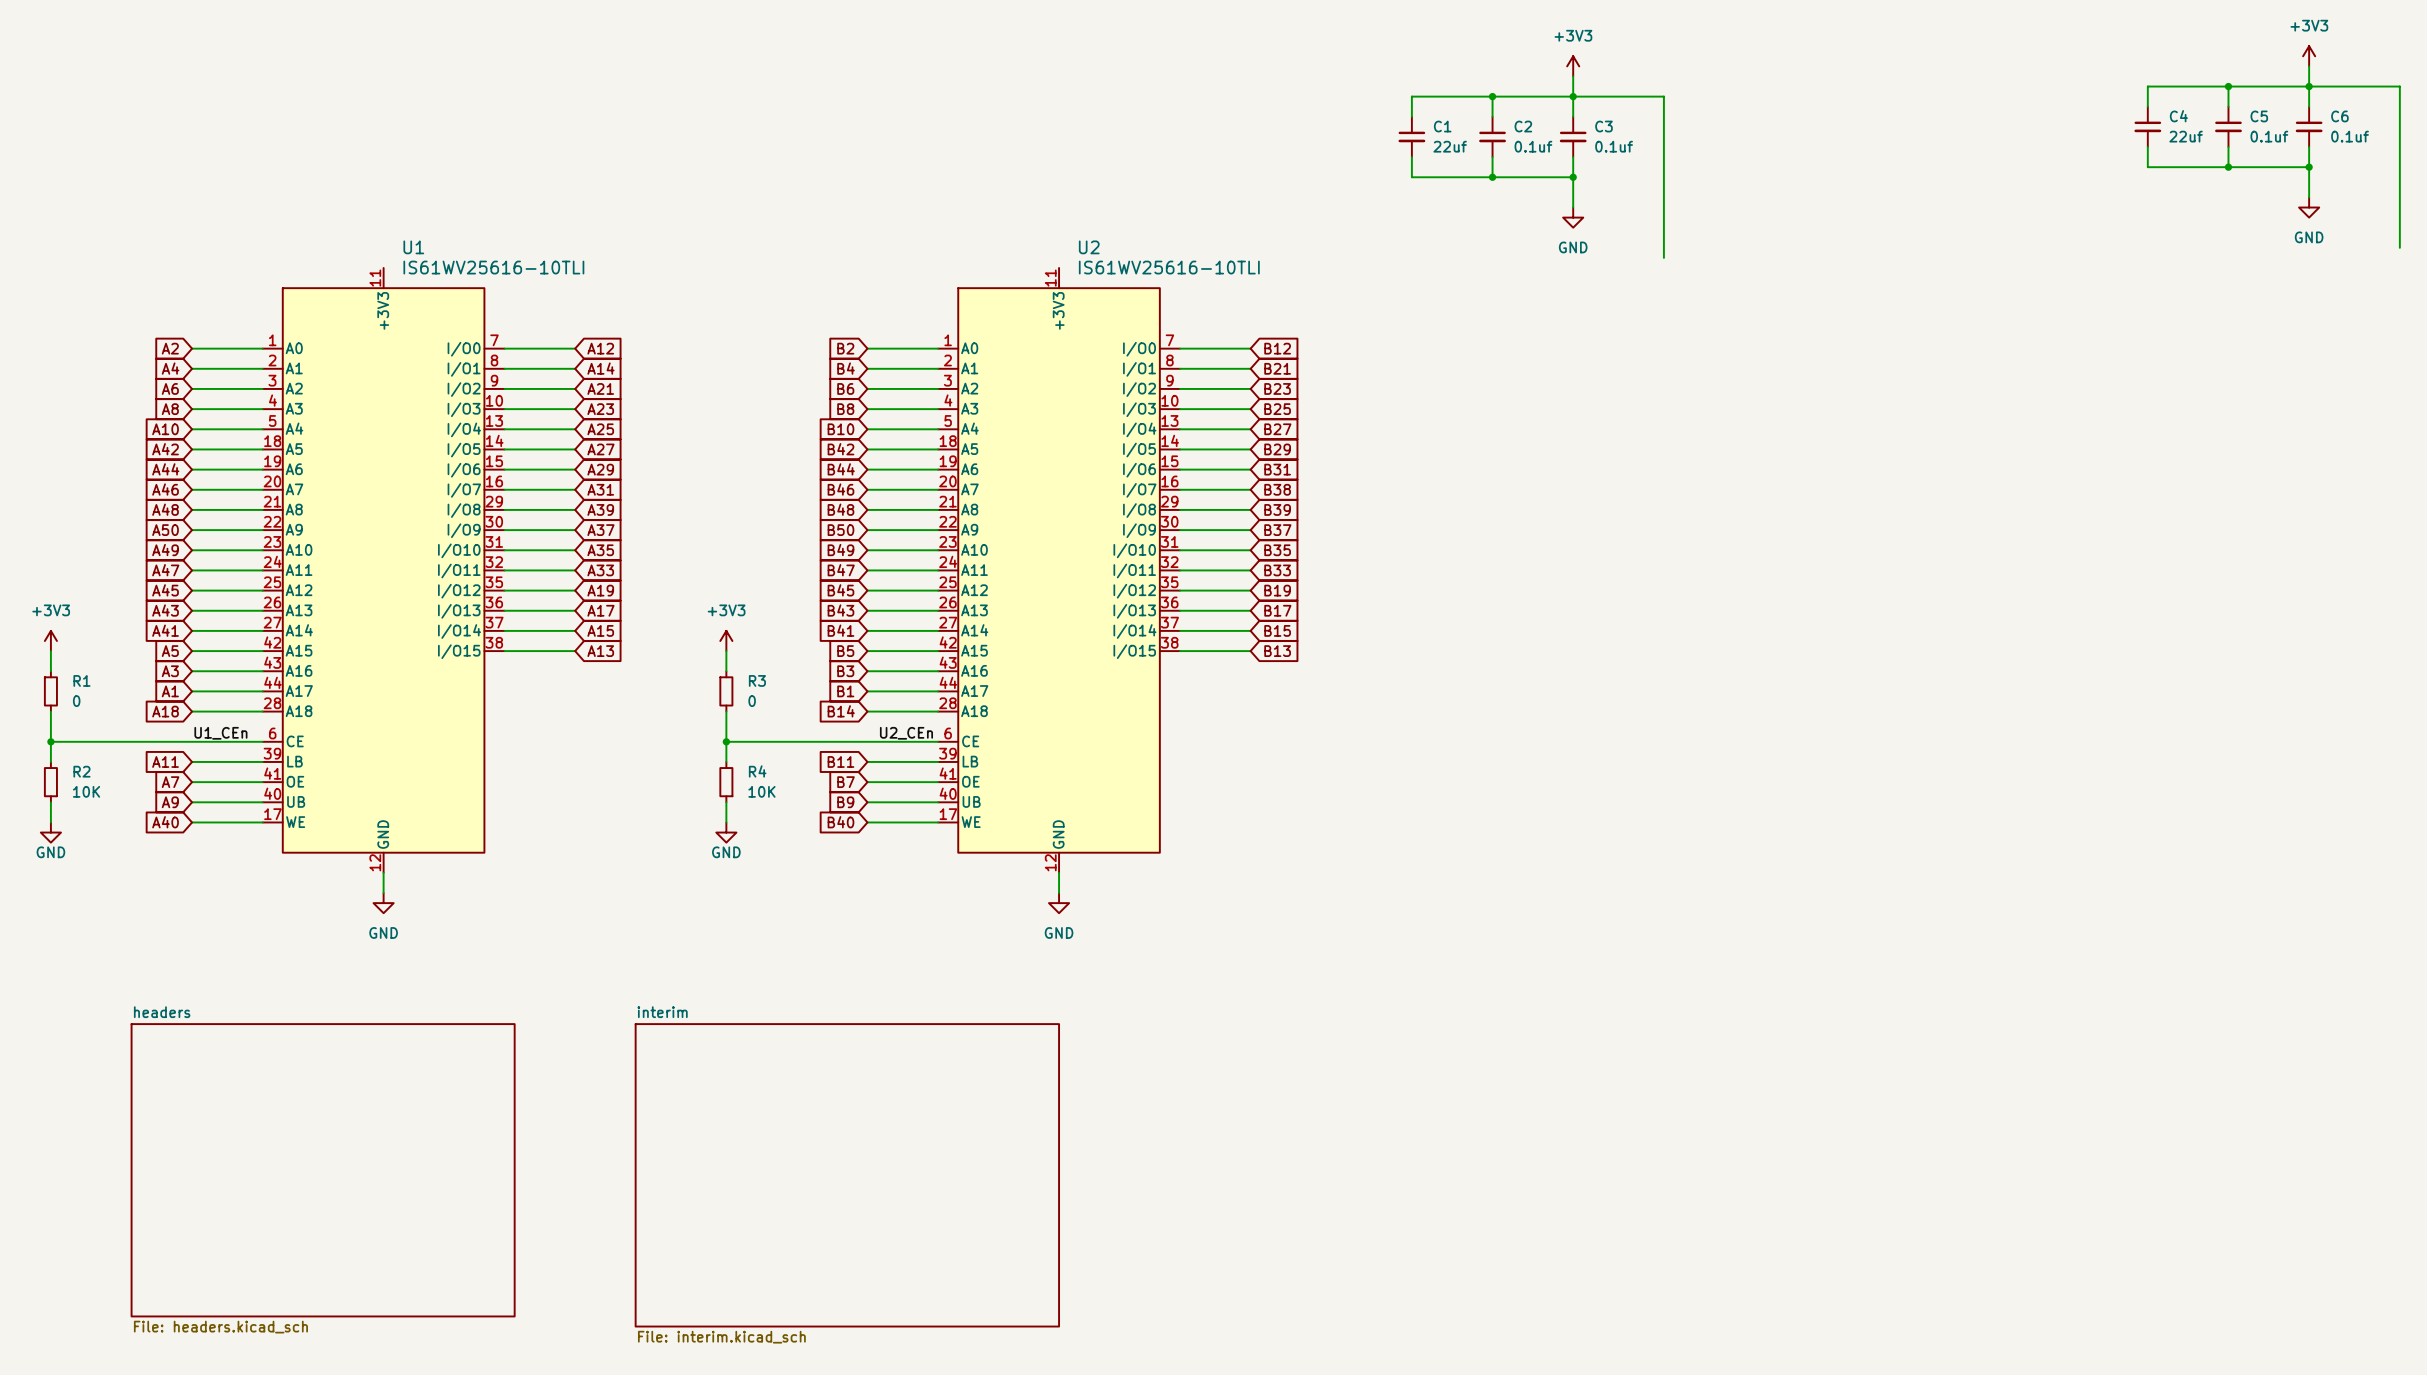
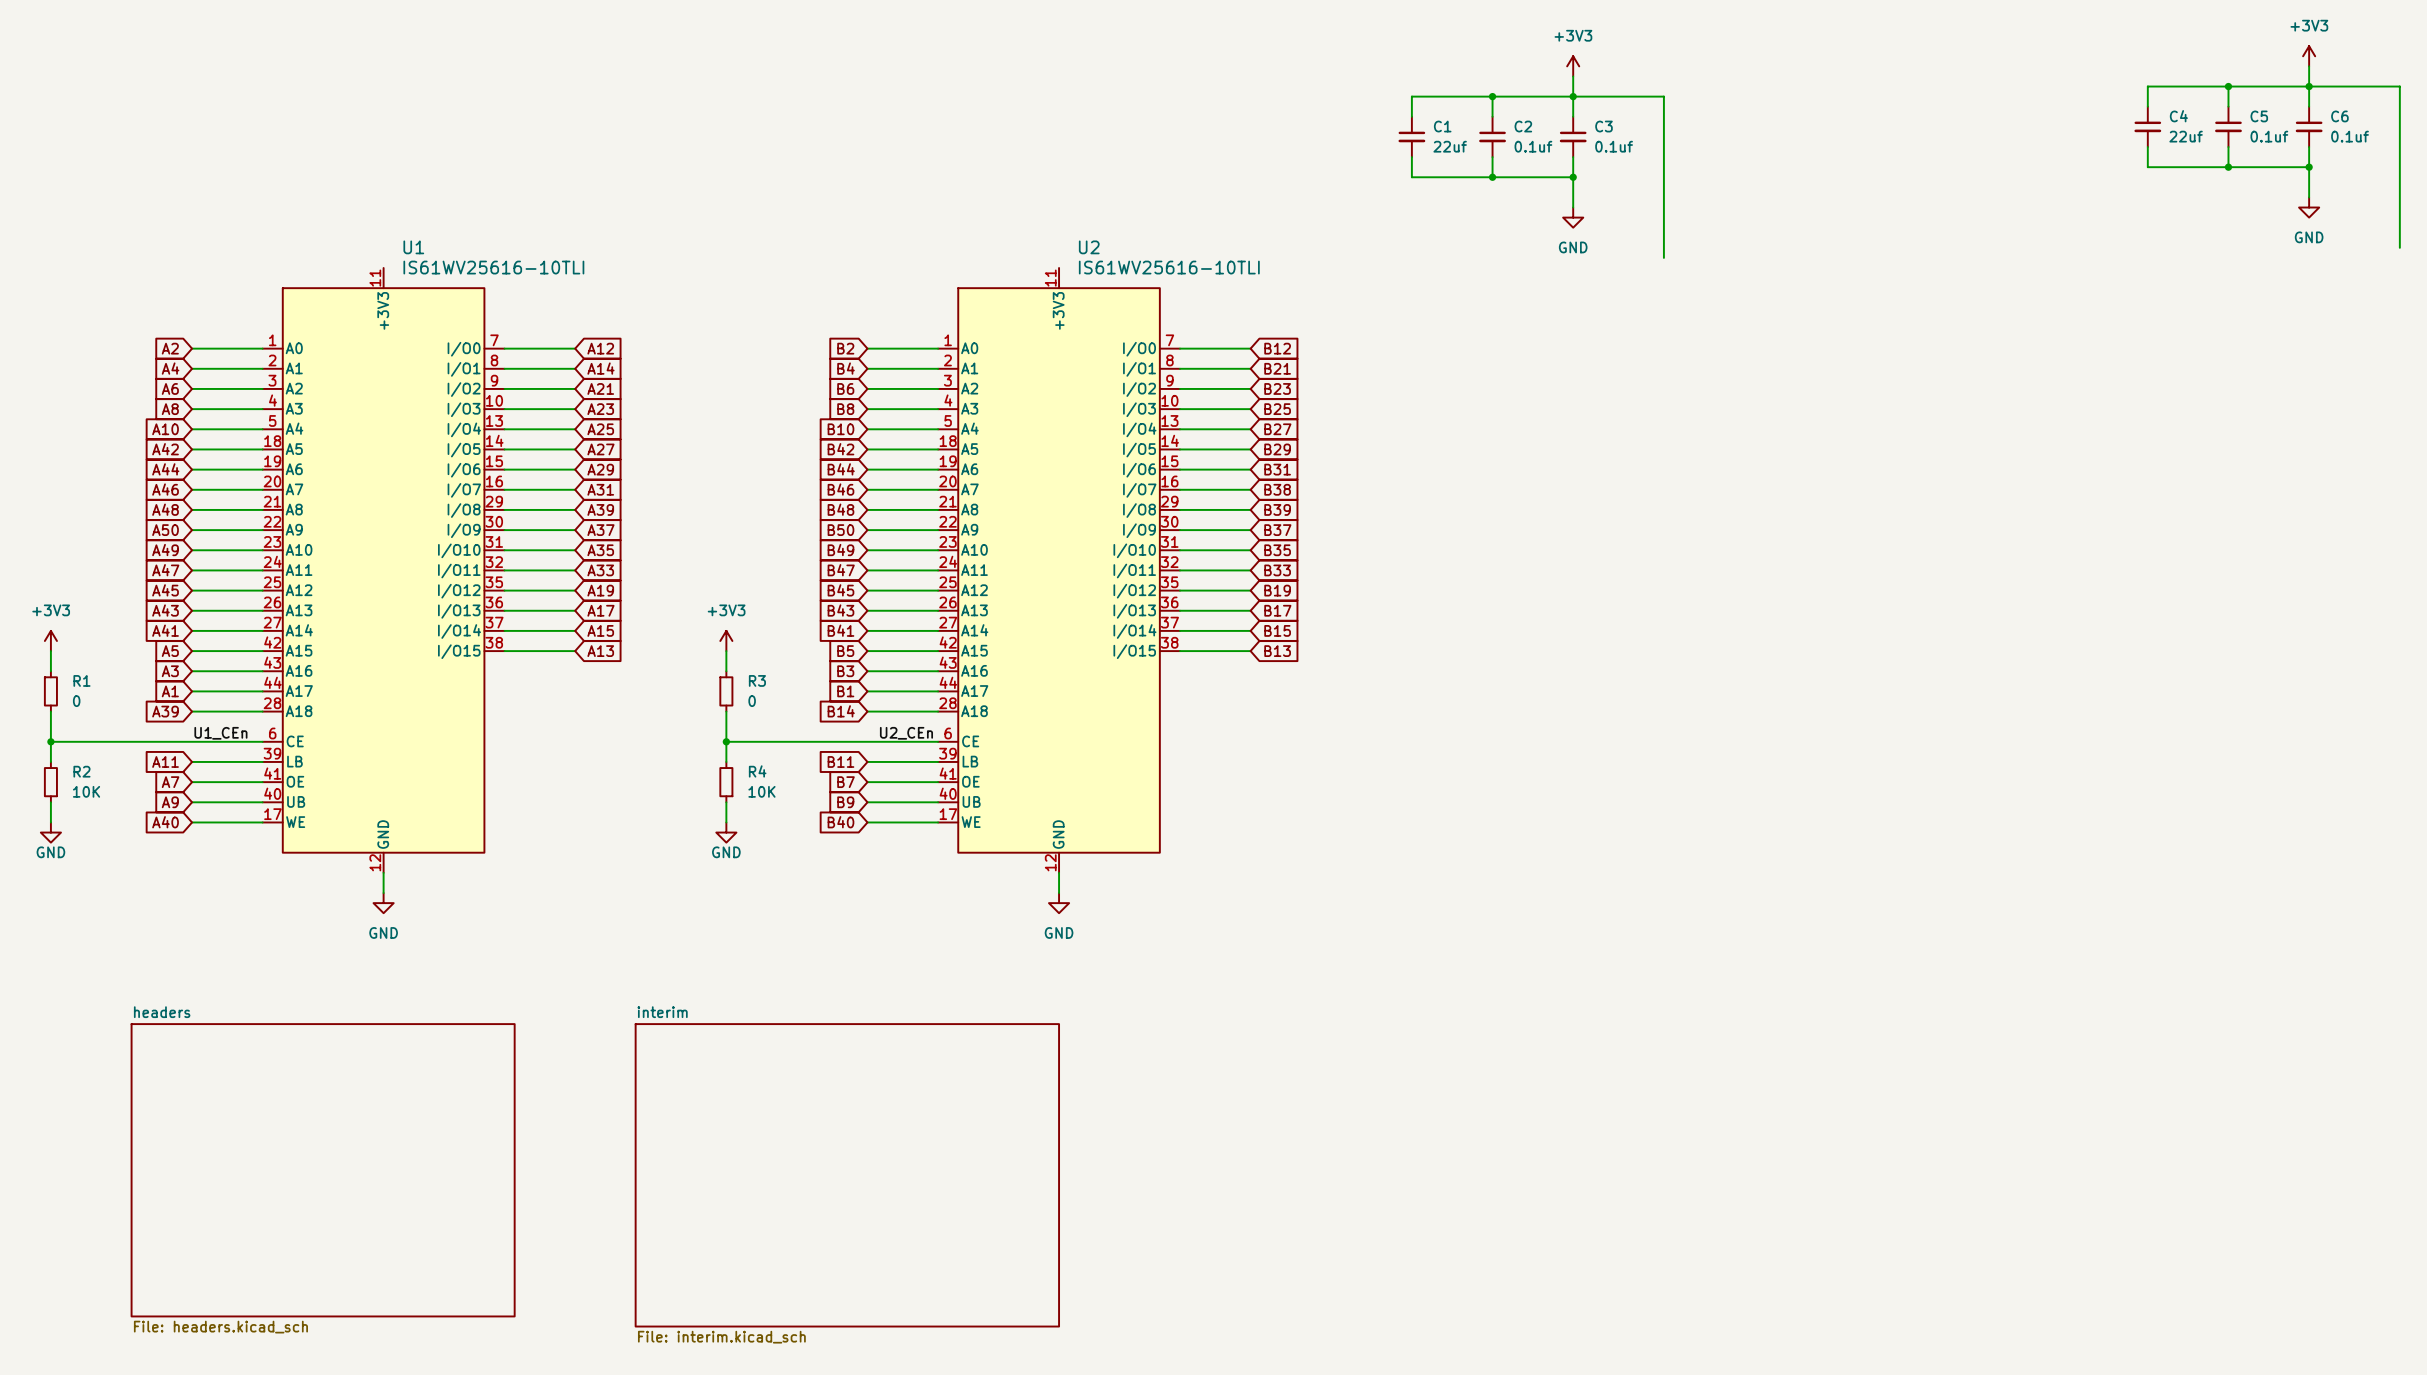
global label: A18 (165, 711) -> A39 (165, 711)

